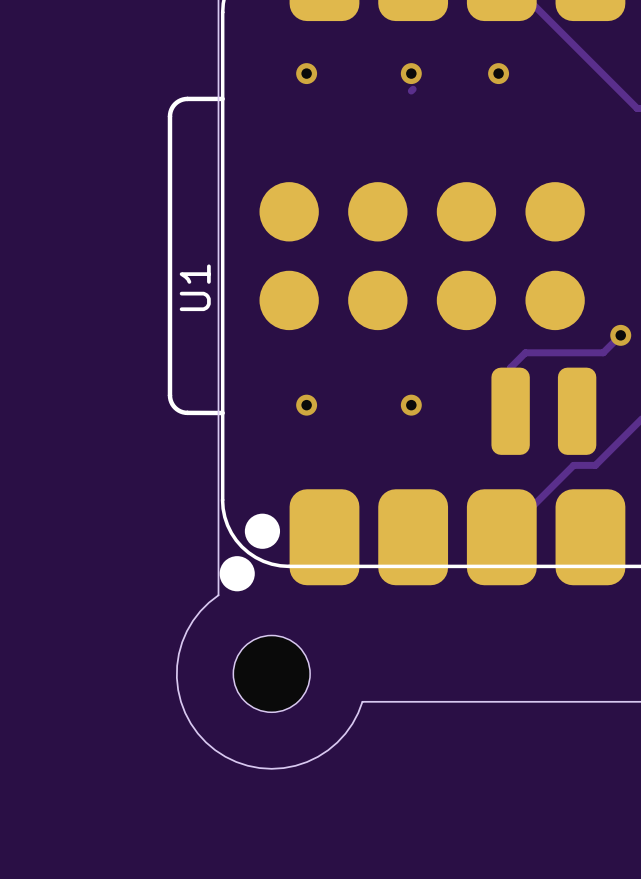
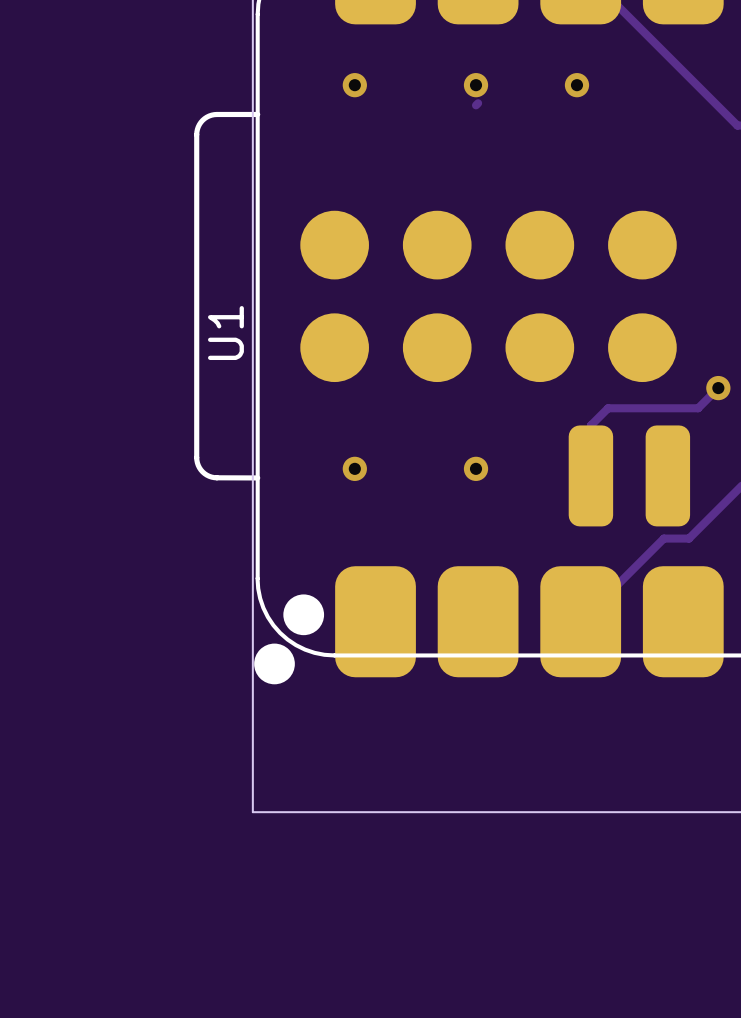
board edge: (218, 595) (200, 611) (186, 631) (178, 653) (176, 677) (180, 701) (190, 723) (206, 742) (215, 750) (236, 761) (259, 768) (283, 768) (307, 762) (328, 750) (345, 733) (358, 713) (362, 701) -> (252, 688) (252, 812) (419, 812)
part: (271, 673) -> none

